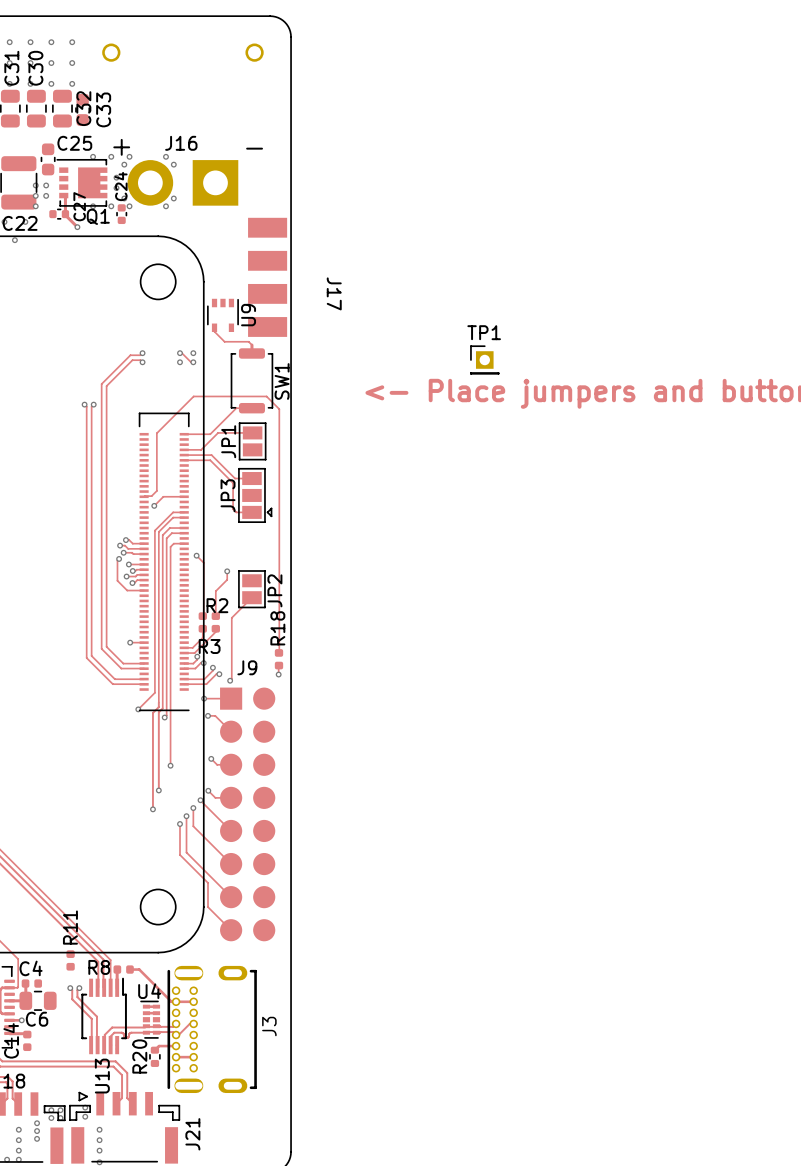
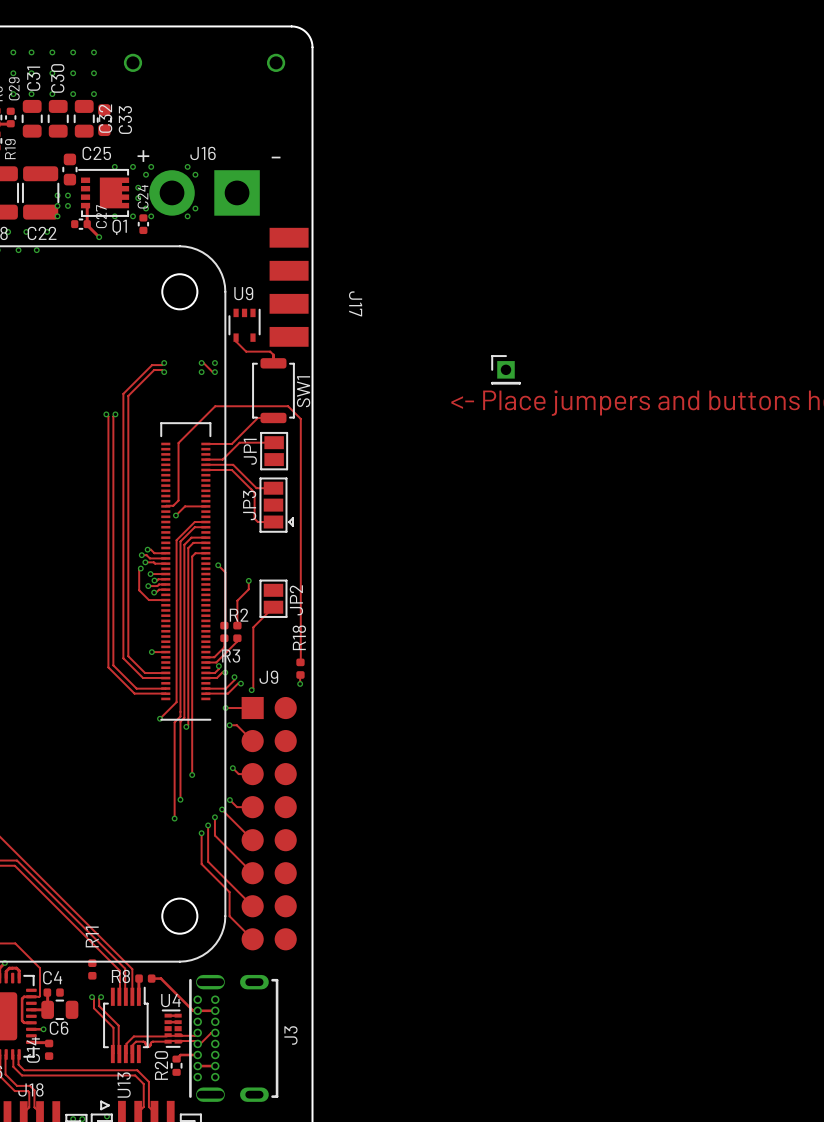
U9 name rotation: 0° (248, 315) -> 90° clockwise (243, 293)
U9 name position: U9 (248, 315) -> U9 (243, 293)
TP1 name: TP1 (484, 332) -> none

